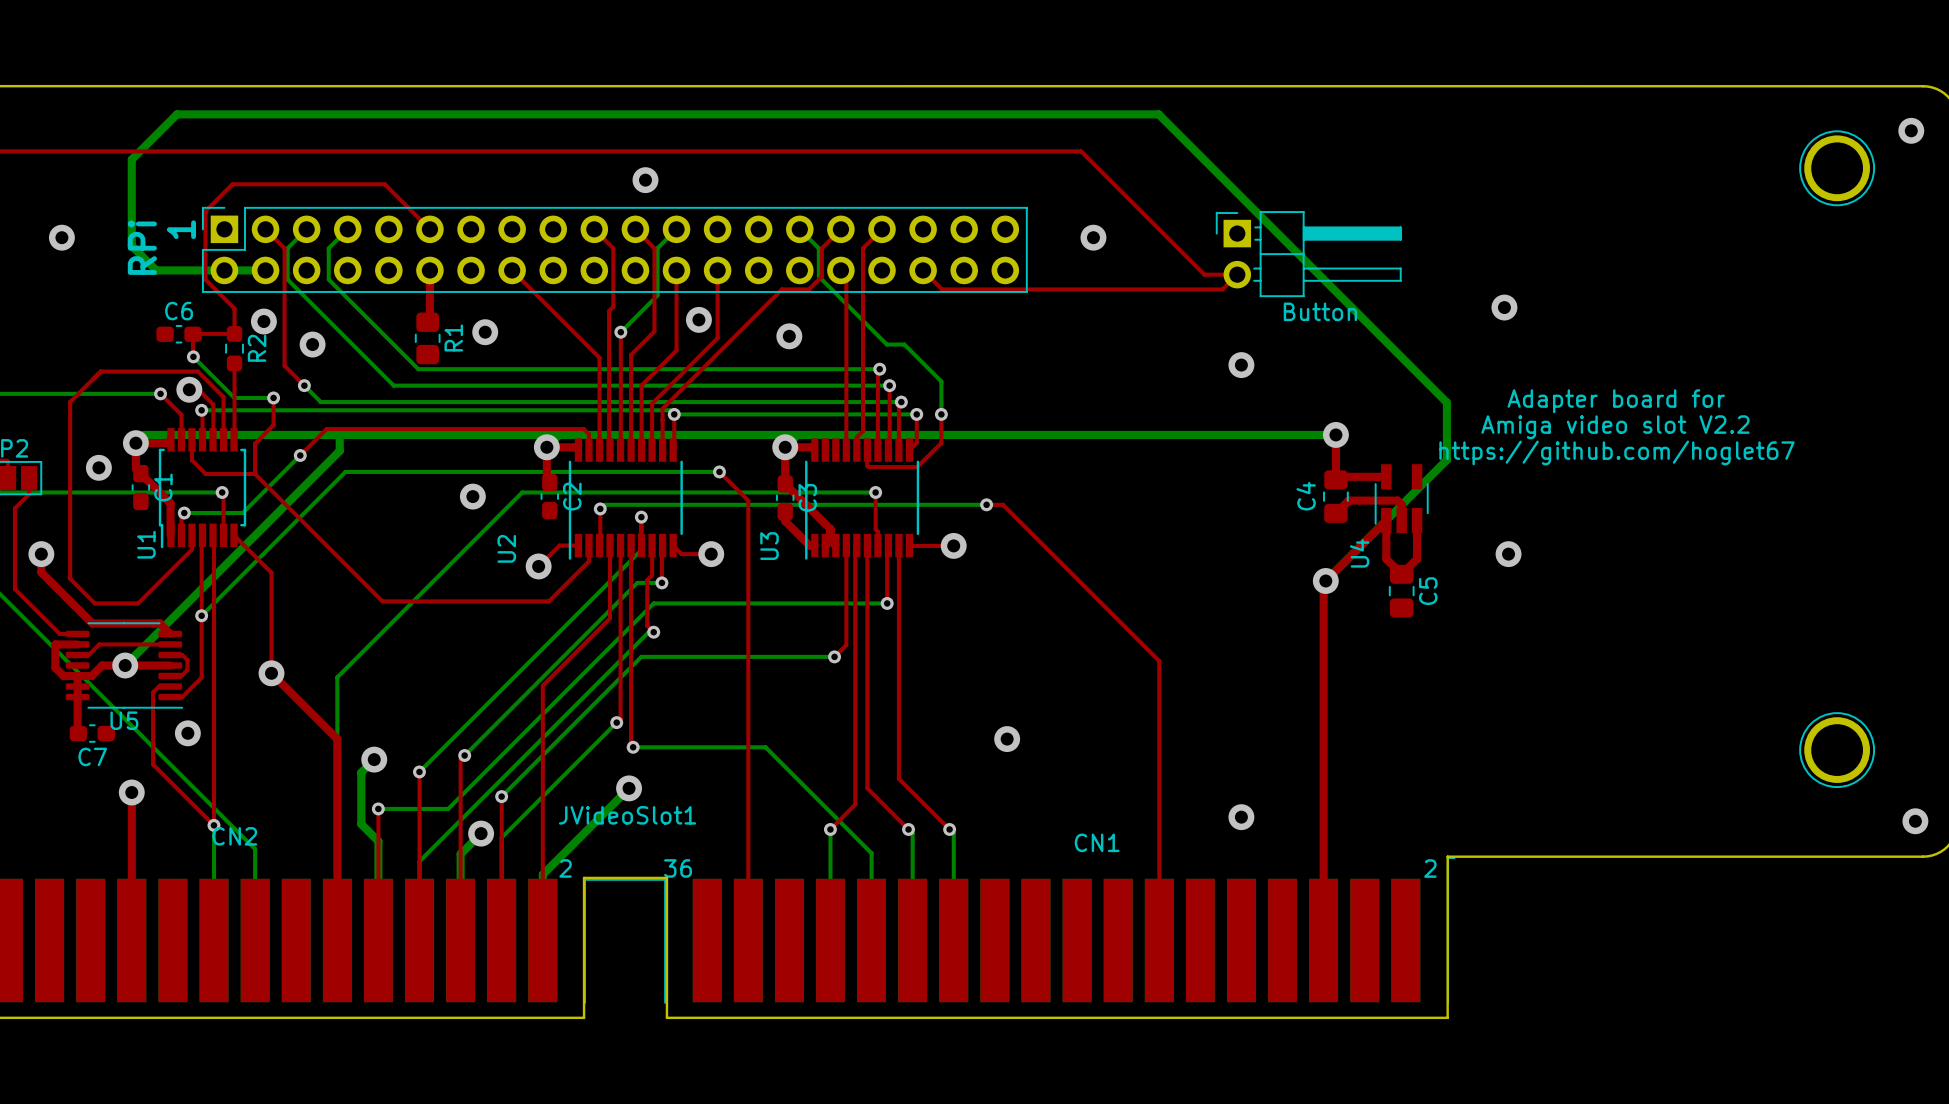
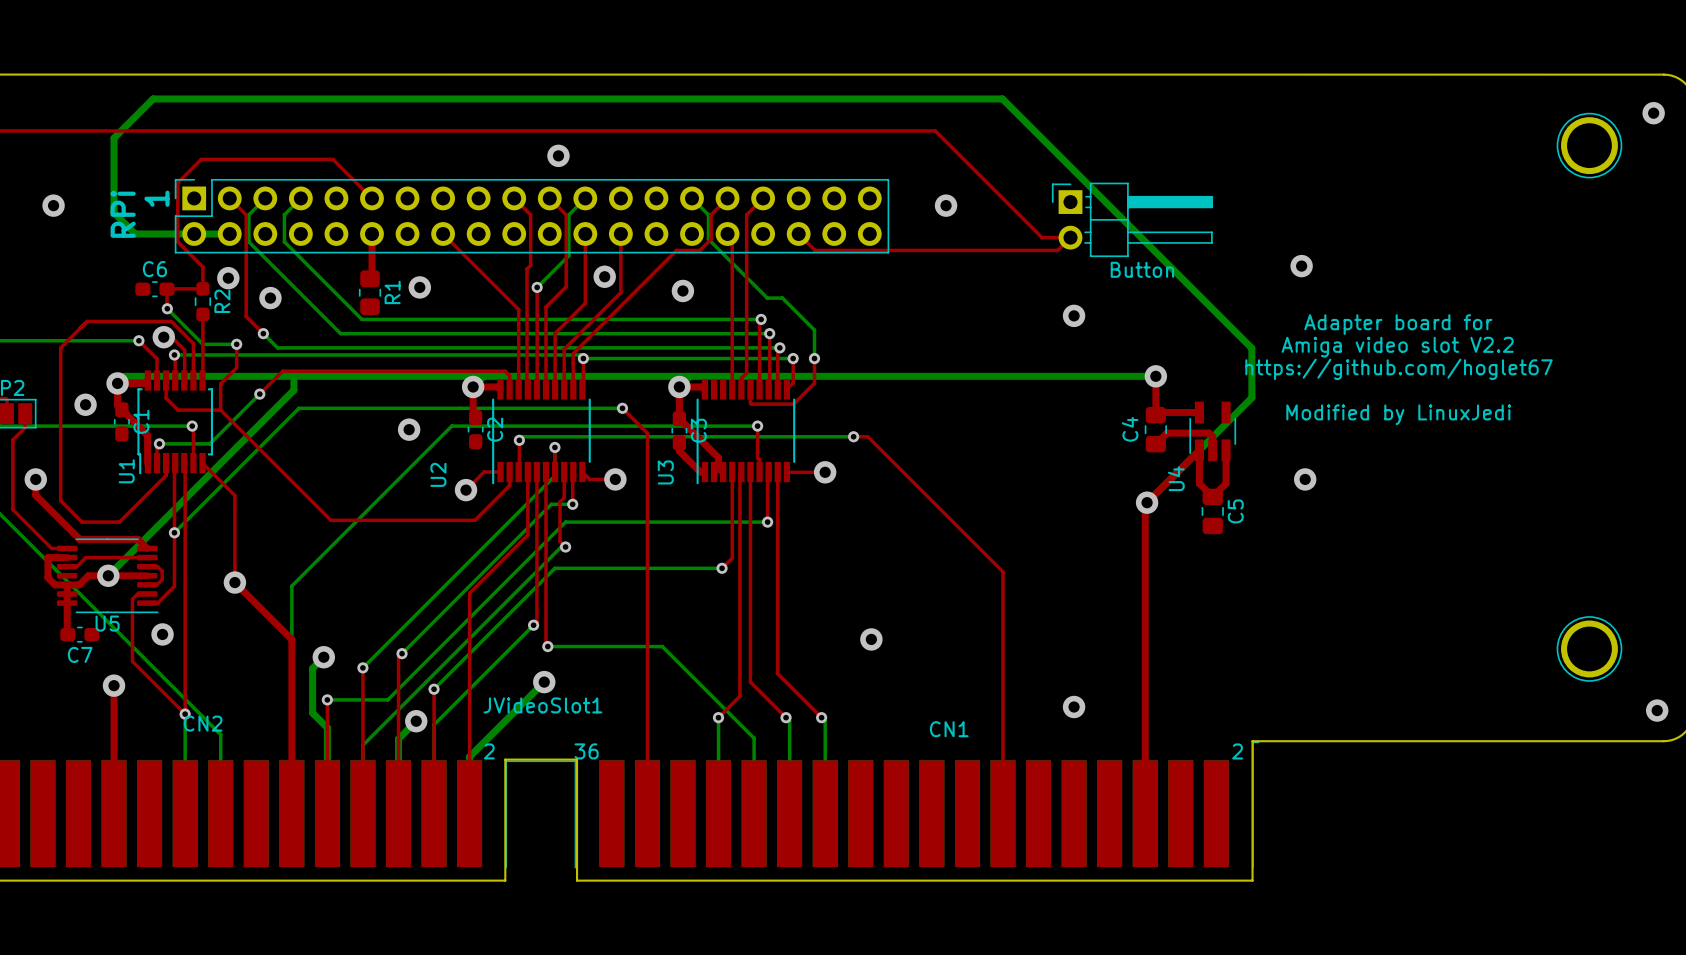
text: none -> Adapter board for (1398, 324)
text: Adapter board for (1616, 401) -> Amiga video slot V2.2 (1397, 347)
text: Amiga video slot V2.2 (1615, 427) -> https://github.com/hoglet67 (1399, 369)
text: https://github.com/hoglet67 (1616, 452) -> none
text: none -> Modified by LinuxJedi (1398, 414)

